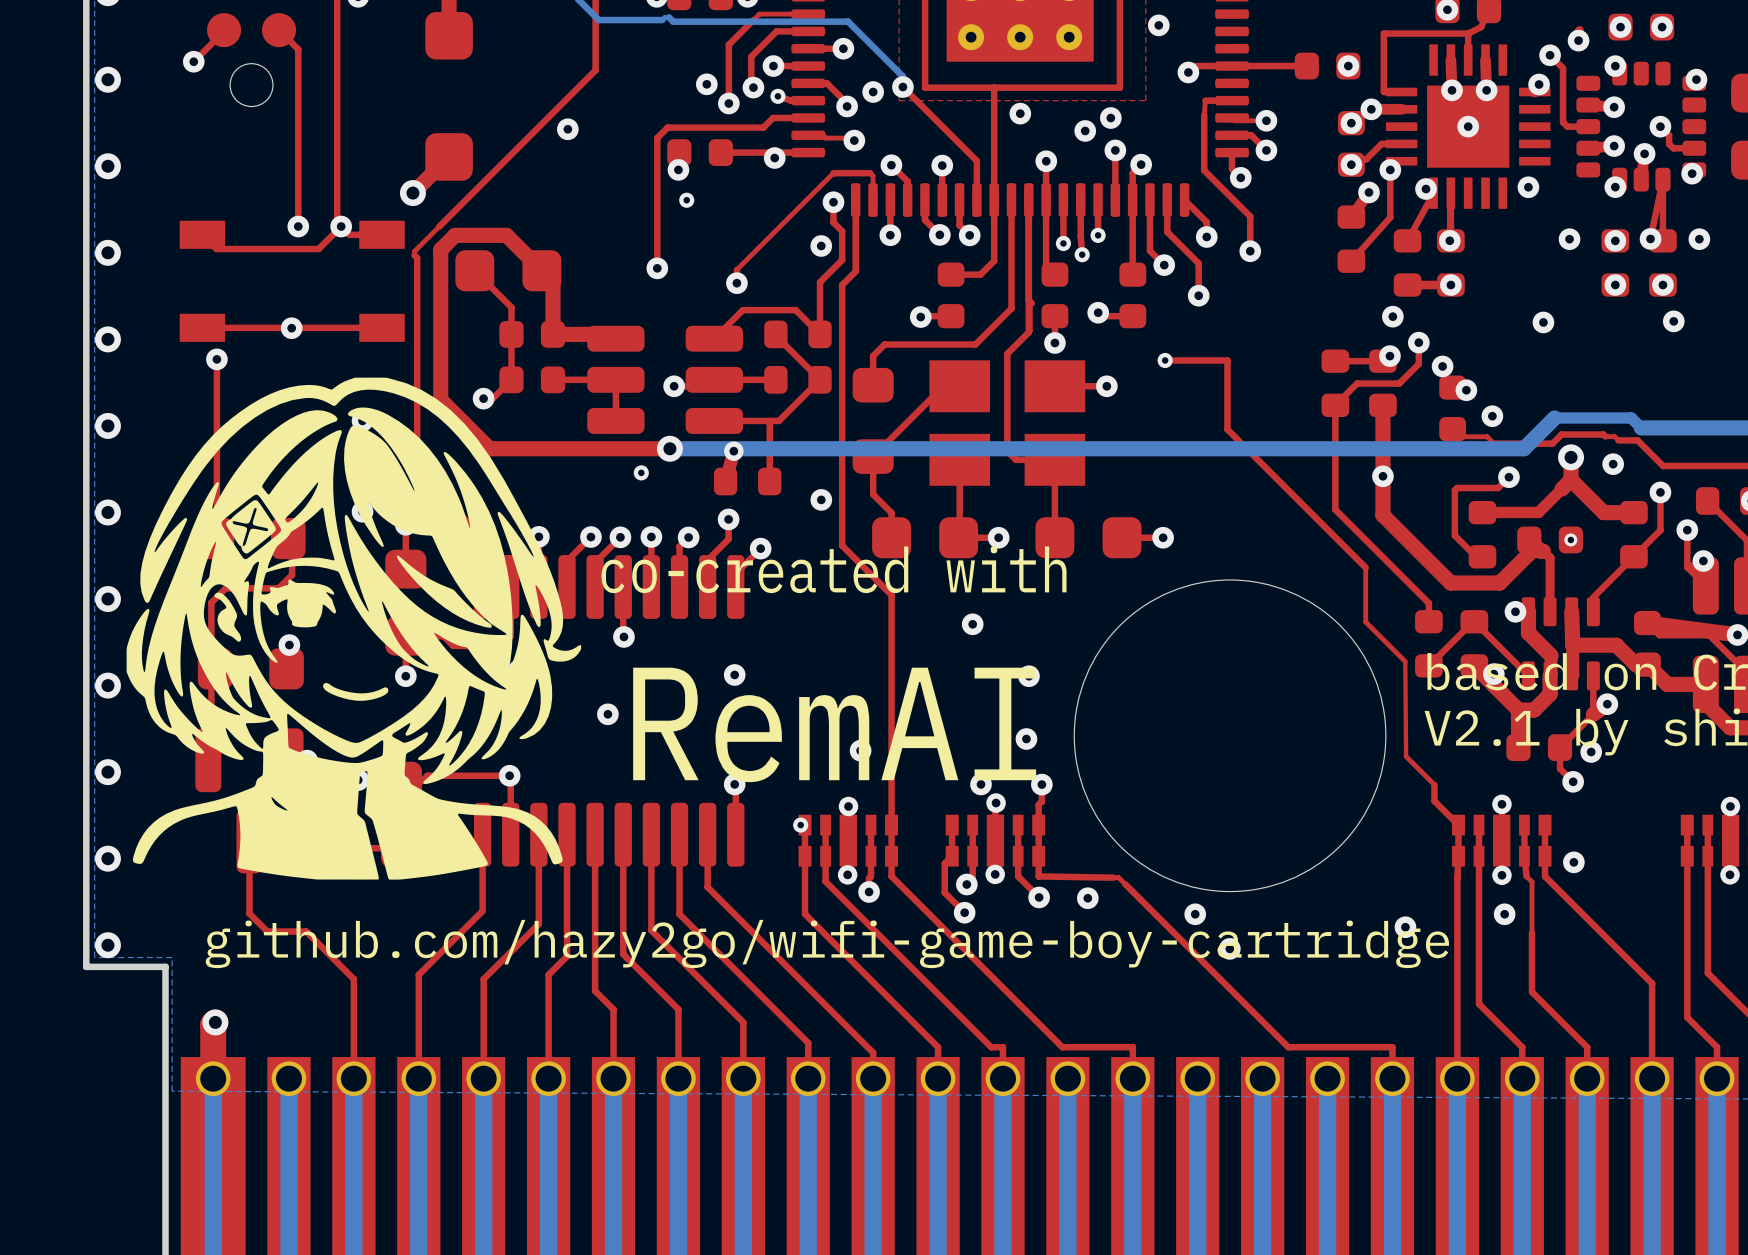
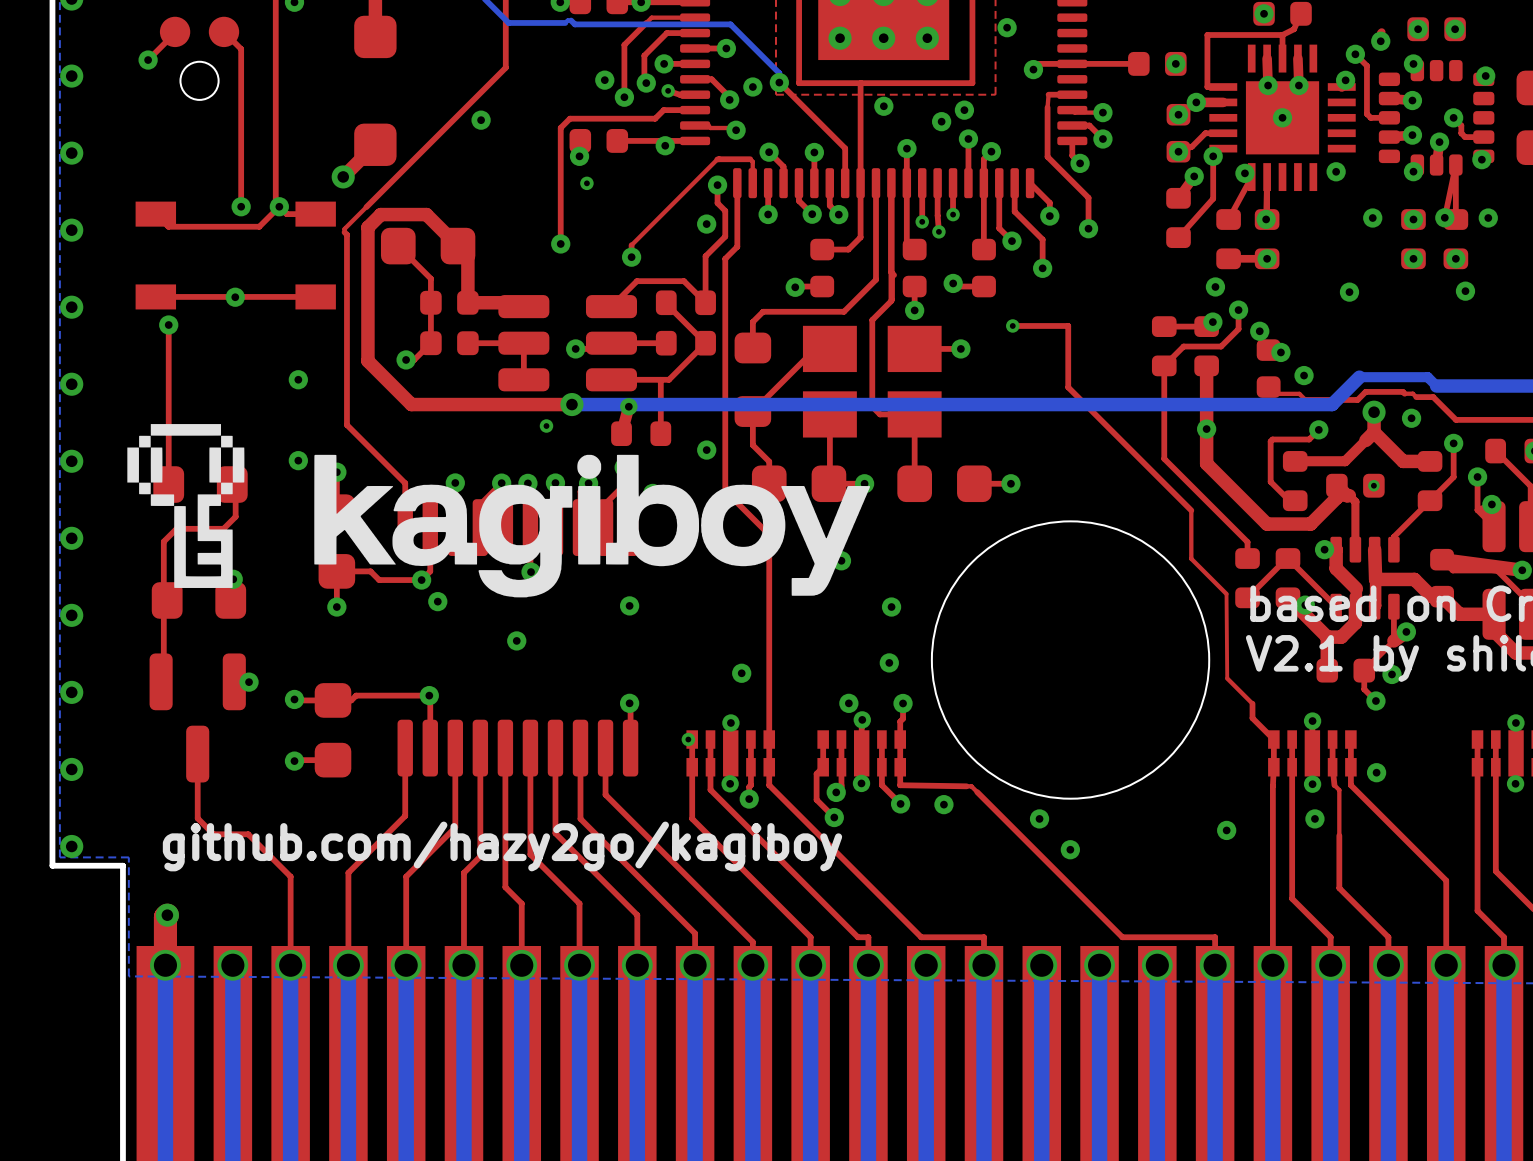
drawing: [126, 377, 582, 880] -> none
drawing: none -> [127, 424, 245, 506]
drawing: none -> [392, 454, 870, 598]
drawing shape: [396, 555, 492, 628] -> [314, 454, 396, 565]
text: co-created with (834, 569) -> none
drawing shape: [214, 592, 242, 642] -> [174, 494, 233, 588]
text: RemAI (834, 724) -> none
text: github.com/hazy2go/wifi-game-boy-cartridge (827, 944) -> github.com/hazy2go/kagiboy (502, 846)

